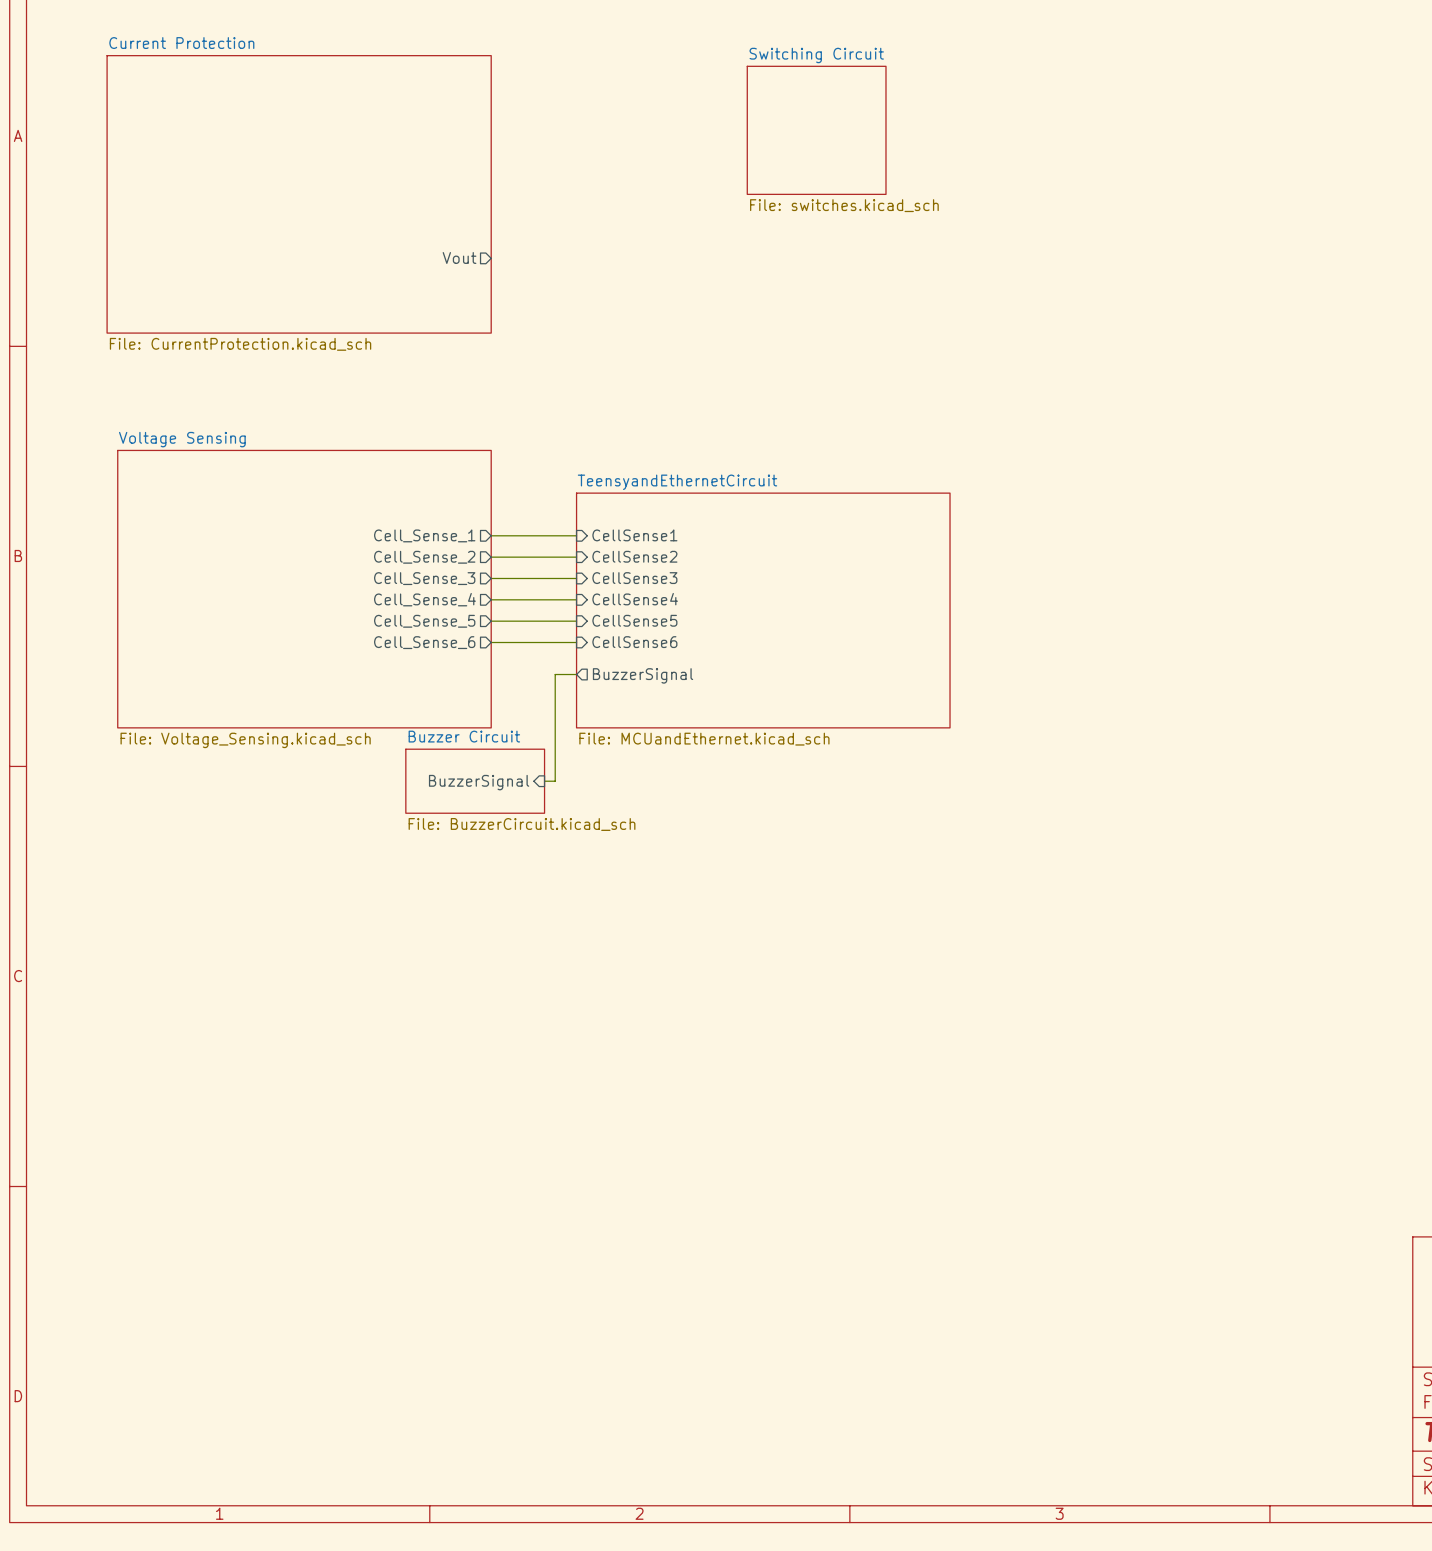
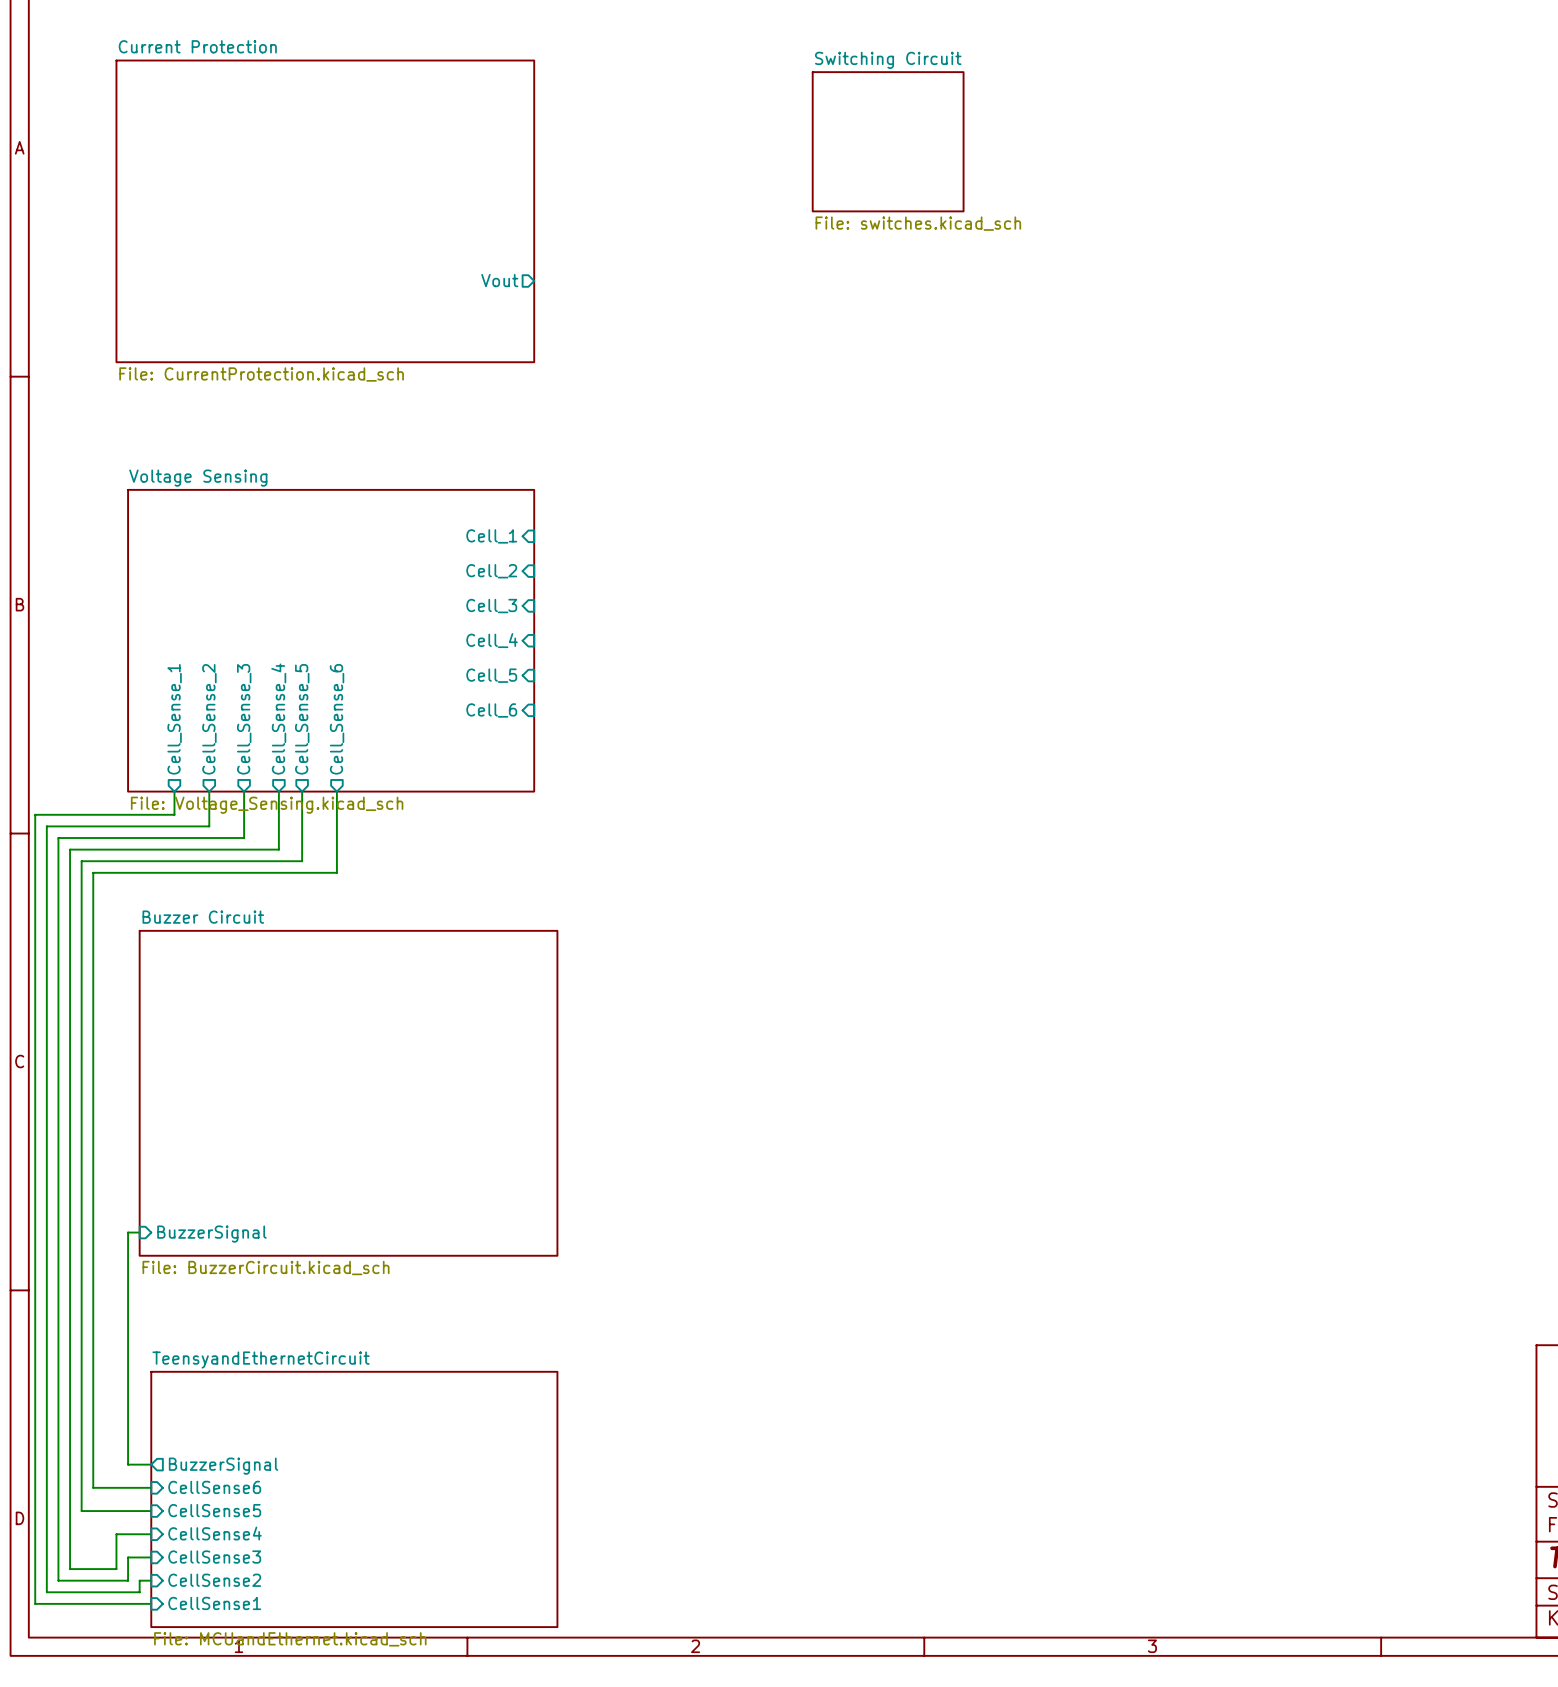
sheet pin: none -> Cell_1 (491, 536)
sheet pin: none -> Cell_2 (491, 571)
sheet pin: Cell_Sense_1 (424, 535) -> none
wire: (491, 535) (576, 535) -> none
sheet pin: CellSense1 (634, 535) -> none
sheet pin: CellSense2 (634, 556) -> none
sheet pin shape: output (424, 557) -> input (491, 606)
sheet pin: Cell_Sense_2 (424, 557) -> Cell_3 (491, 606)
wire: (491, 557) (576, 557) -> none
sheet pin: Cell_Sense_3 (424, 578) -> none
wire: (491, 578) (576, 578) -> none
sheet pin: CellSense3 (634, 578) -> none
sheet pin shape: output (424, 599) -> input (492, 640)
sheet pin: Cell_Sense_4 (424, 599) -> Cell_4 (492, 640)
wire: (491, 599) (576, 599) -> none
sheet pin: CellSense4 (635, 599) -> none
sheet TeensyandEthernetCircuit: File: MCUandEthernet.kicad_sch (763, 610) -> none
sheet pin: CellSense5 (634, 620) -> none
sheet pin shape: output (424, 621) -> input (491, 675)
sheet pin: Cell_Sense_5 (424, 621) -> Cell_5 (491, 675)
wire: (491, 621) (576, 621) -> none
sheet pin rotation: 0° (424, 642) -> 90° clockwise (337, 719)
wire: (491, 642) (576, 642) -> none
sheet pin: CellSense6 (634, 642) -> none
sheet pin: none -> Cell_6 (491, 710)
sheet pin: none -> Cell_Sense_1 (174, 719)
sheet pin: none -> Cell_Sense_2 (209, 719)
sheet pin: none -> Cell_Sense_3 (244, 719)
sheet pin: none -> Cell_Sense_4 (278, 719)
sheet pin: none -> Cell_Sense_5 (302, 719)
wire: (576, 674) (555, 674) (555, 781) (544, 781) -> none
sheet pin: BuzzerSignal (643, 675) -> none
wire: none -> (174, 791) (174, 814) (35, 814) (35, 1603) (151, 1603)
wire: none -> (209, 791) (209, 826) (46, 826) (46, 1592) (139, 1592) (139, 1580) (151, 1580)
wire: none -> (244, 791) (244, 838) (58, 838) (58, 1580) (128, 1580) (128, 1557) (151, 1557)
wire: none -> (278, 791) (278, 849) (70, 849) (70, 1569) (116, 1569) (116, 1534) (151, 1534)
wire: none -> (302, 791) (302, 861) (81, 861) (81, 1511) (151, 1511)
wire: none -> (336, 791) (336, 872) (93, 872) (93, 1487) (151, 1487)
sheet Buzzer Circuit: File: BuzzerCircuit.kicad_sch (475, 781) -> none
sheet pin: BuzzerSignal (479, 782) -> none
sheet Buzzer Circuit: none -> File: BuzzerCircuit.kicad_sch (348, 1093)
wire: none -> (139, 1232) (128, 1232) (128, 1464) (151, 1464)
sheet pin: none -> BuzzerSignal (211, 1234)
sheet pin: none -> BuzzerSignal (223, 1466)
sheet pin: none -> CellSense6 (214, 1487)
sheet TeensyandEthernetCircuit: none -> File: MCUandEthernet.kicad_sch (354, 1499)
sheet pin: none -> CellSense5 (214, 1510)
sheet pin: none -> CellSense4 (214, 1533)
sheet pin: none -> CellSense3 (214, 1557)
sheet pin: none -> CellSense2 (214, 1580)
sheet pin: none -> CellSense1 (214, 1603)

